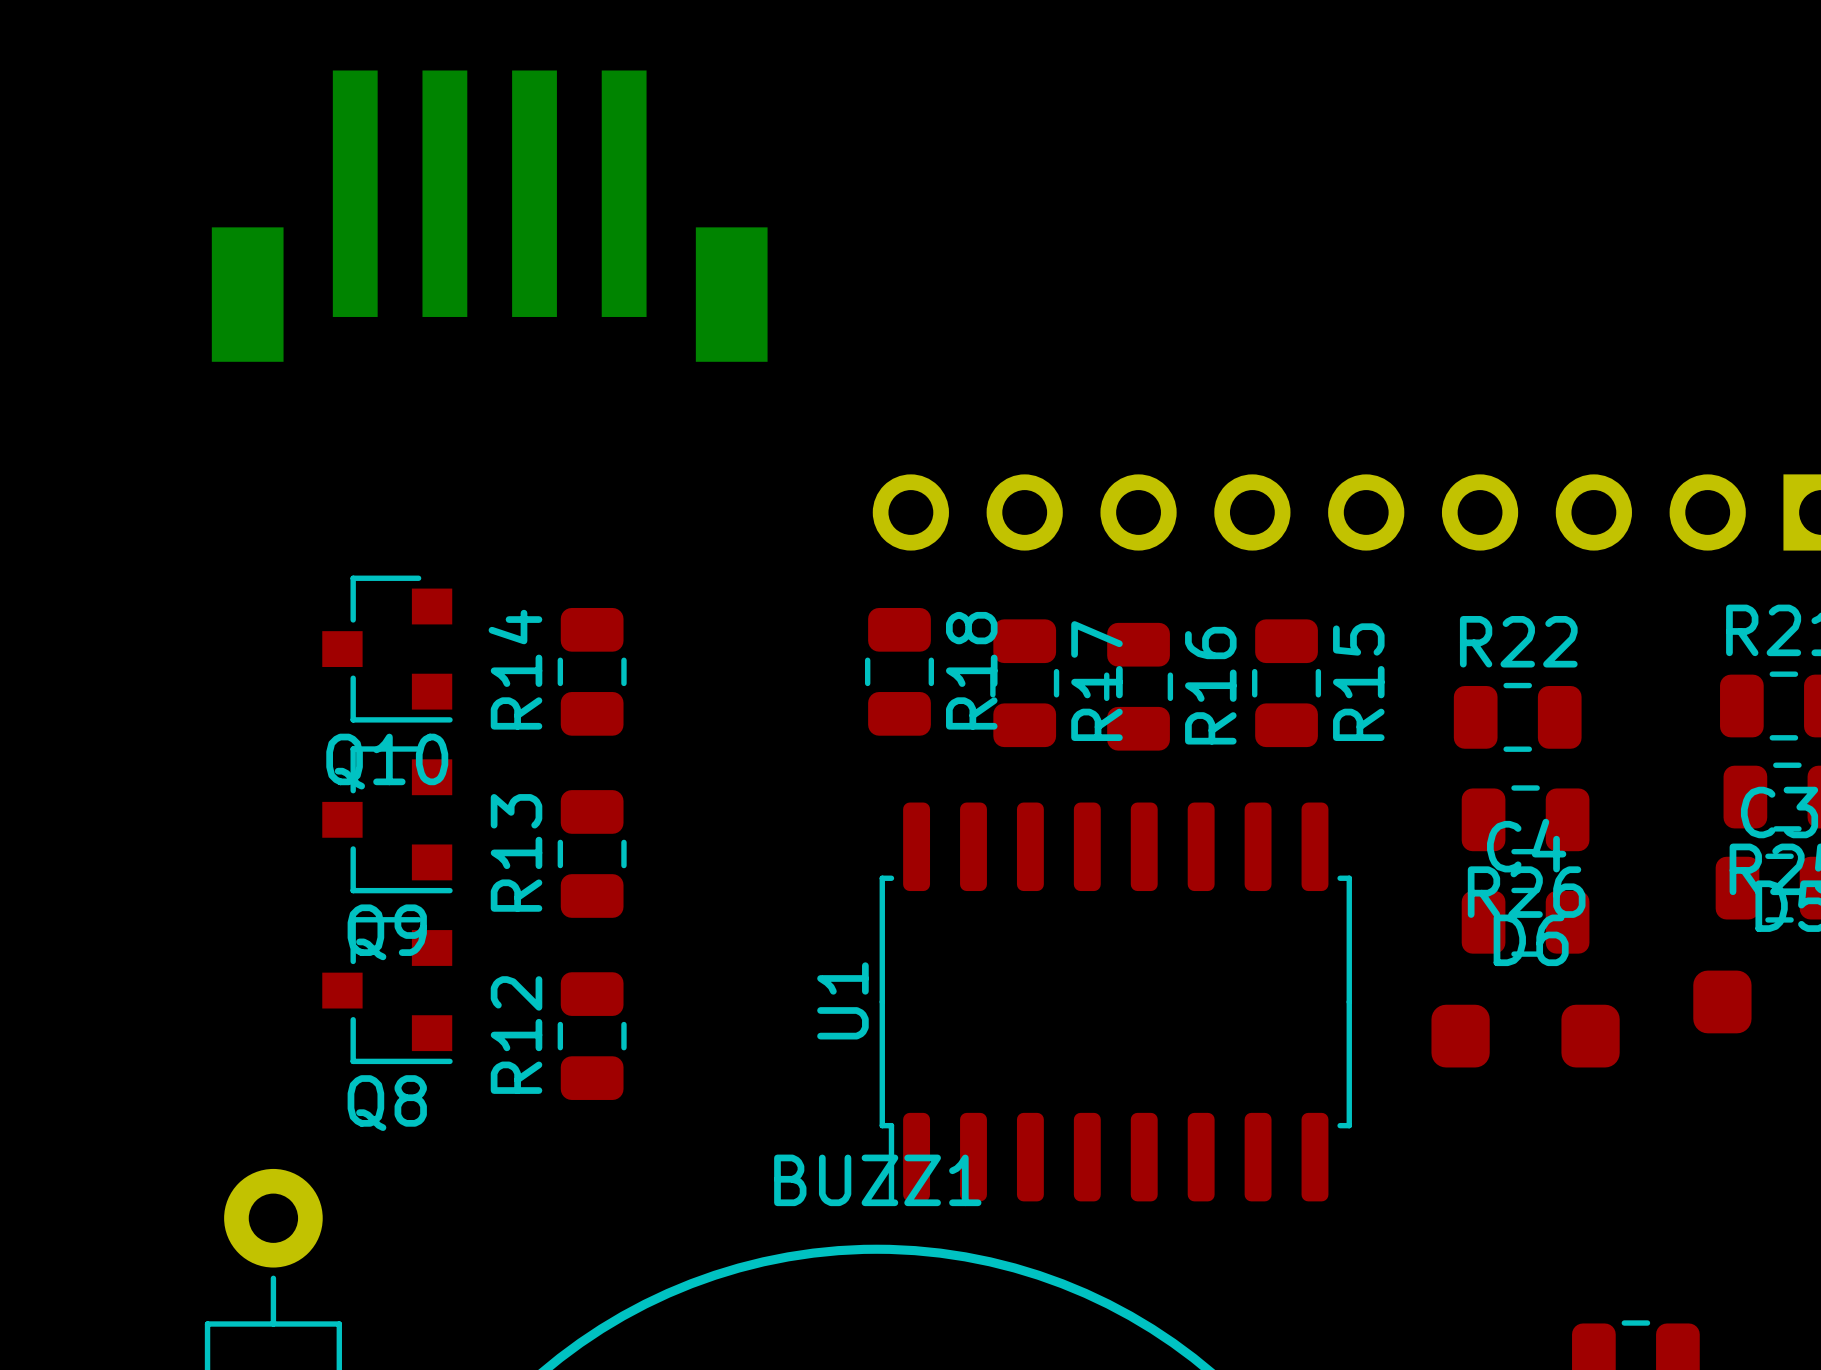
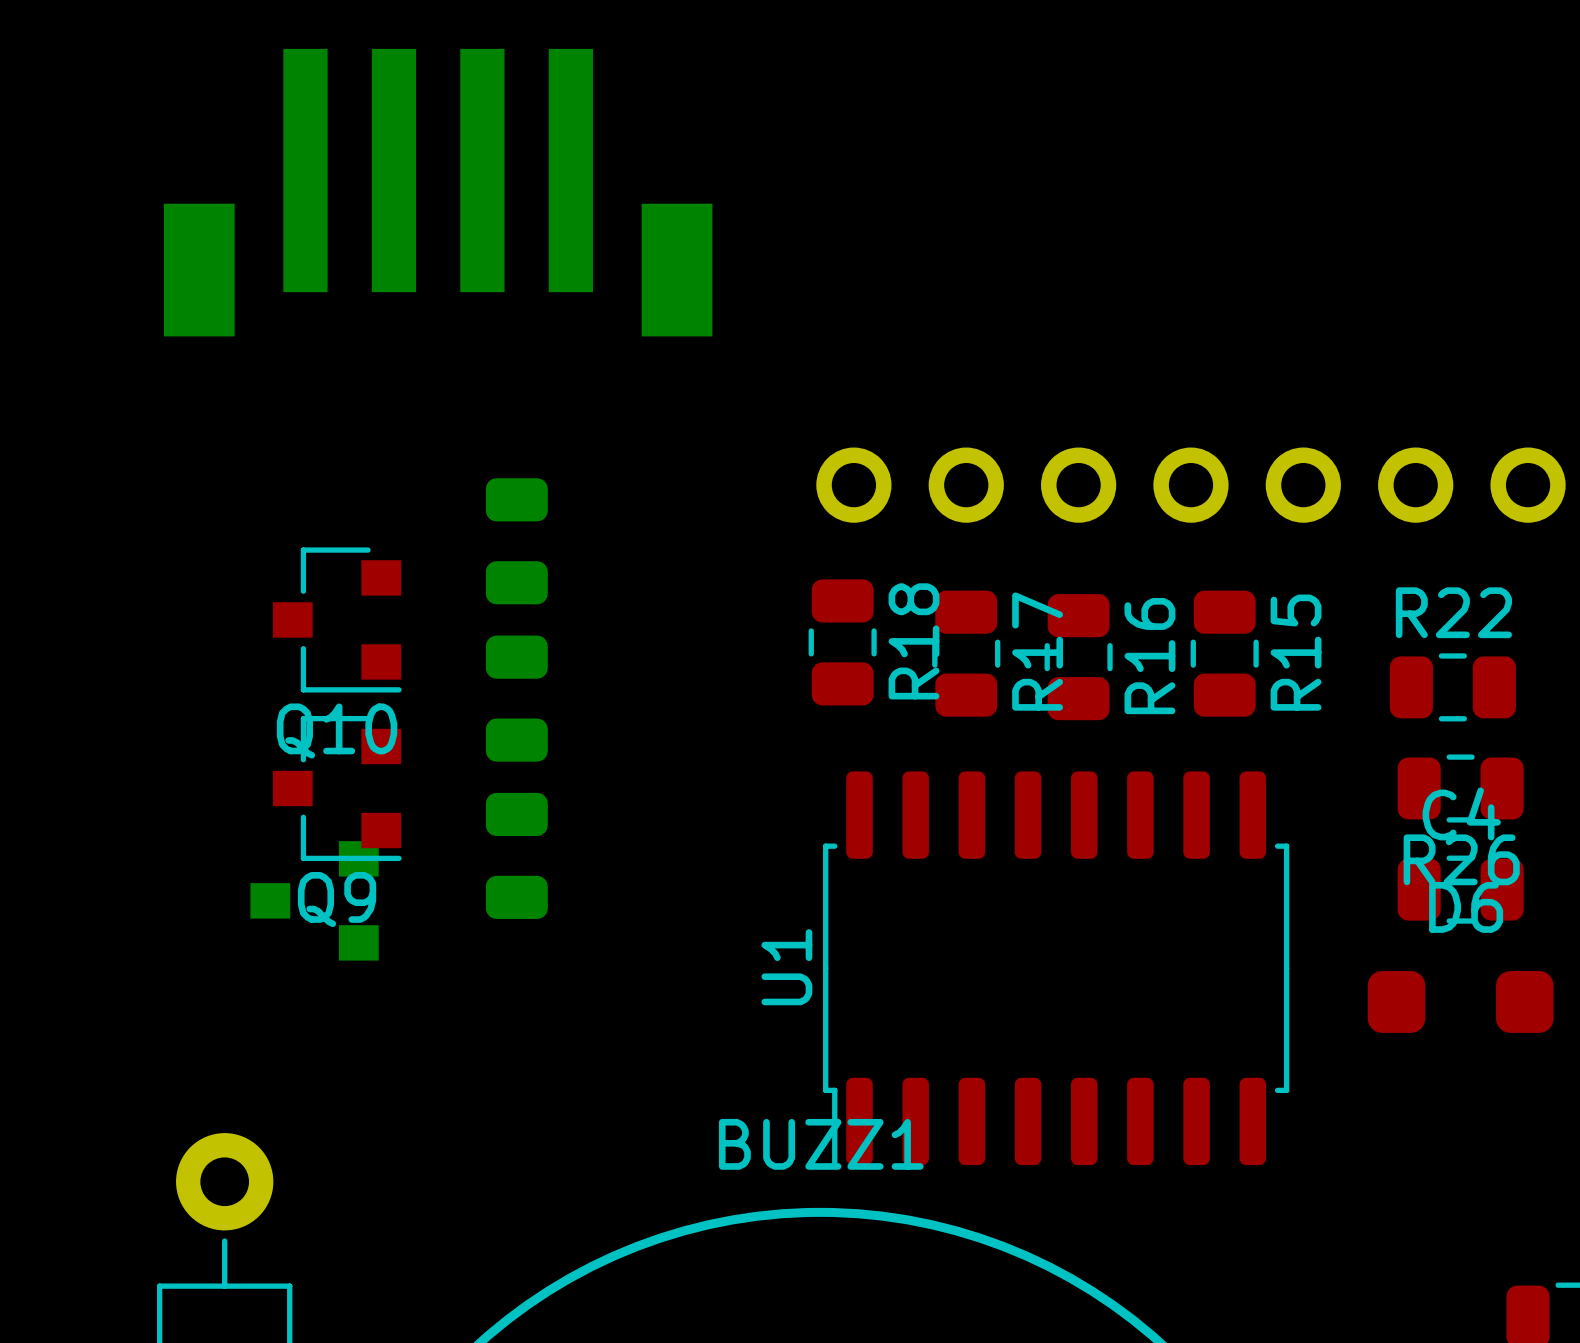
R14 side: top (592, 671) -> bottom (516, 541)
R13 side: top (592, 853) -> bottom (516, 698)
Q8 side: top (387, 990) -> bottom (314, 900)
R12 side: top (592, 1036) -> bottom (516, 855)

